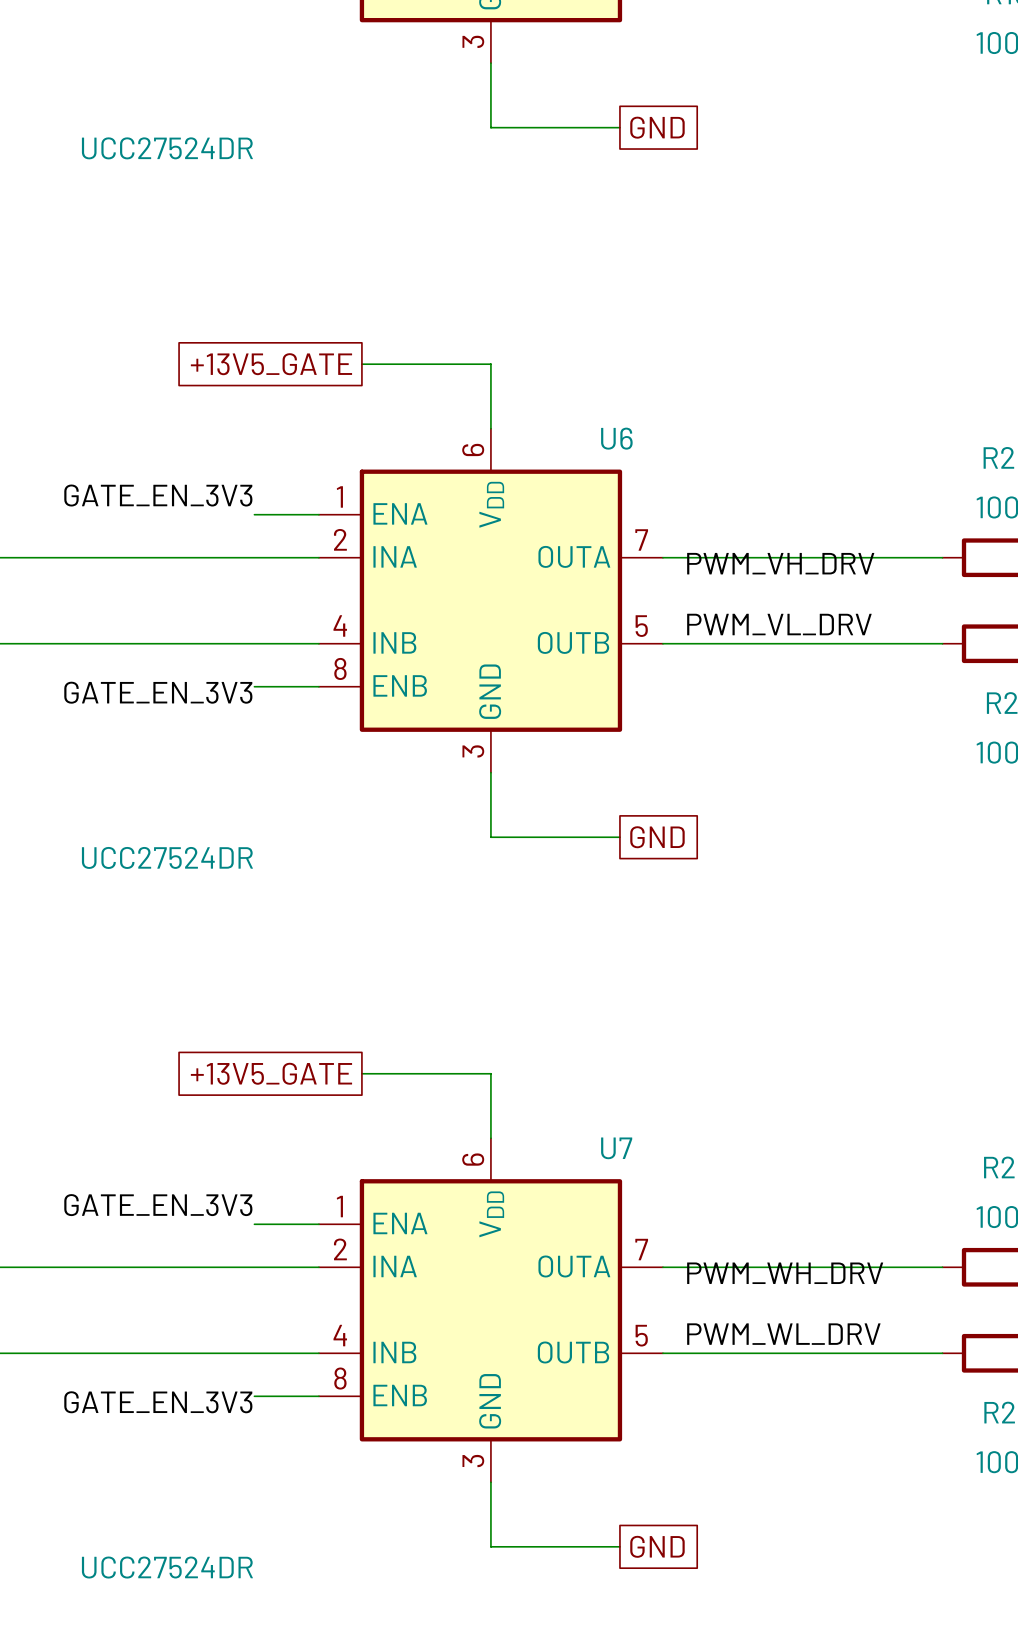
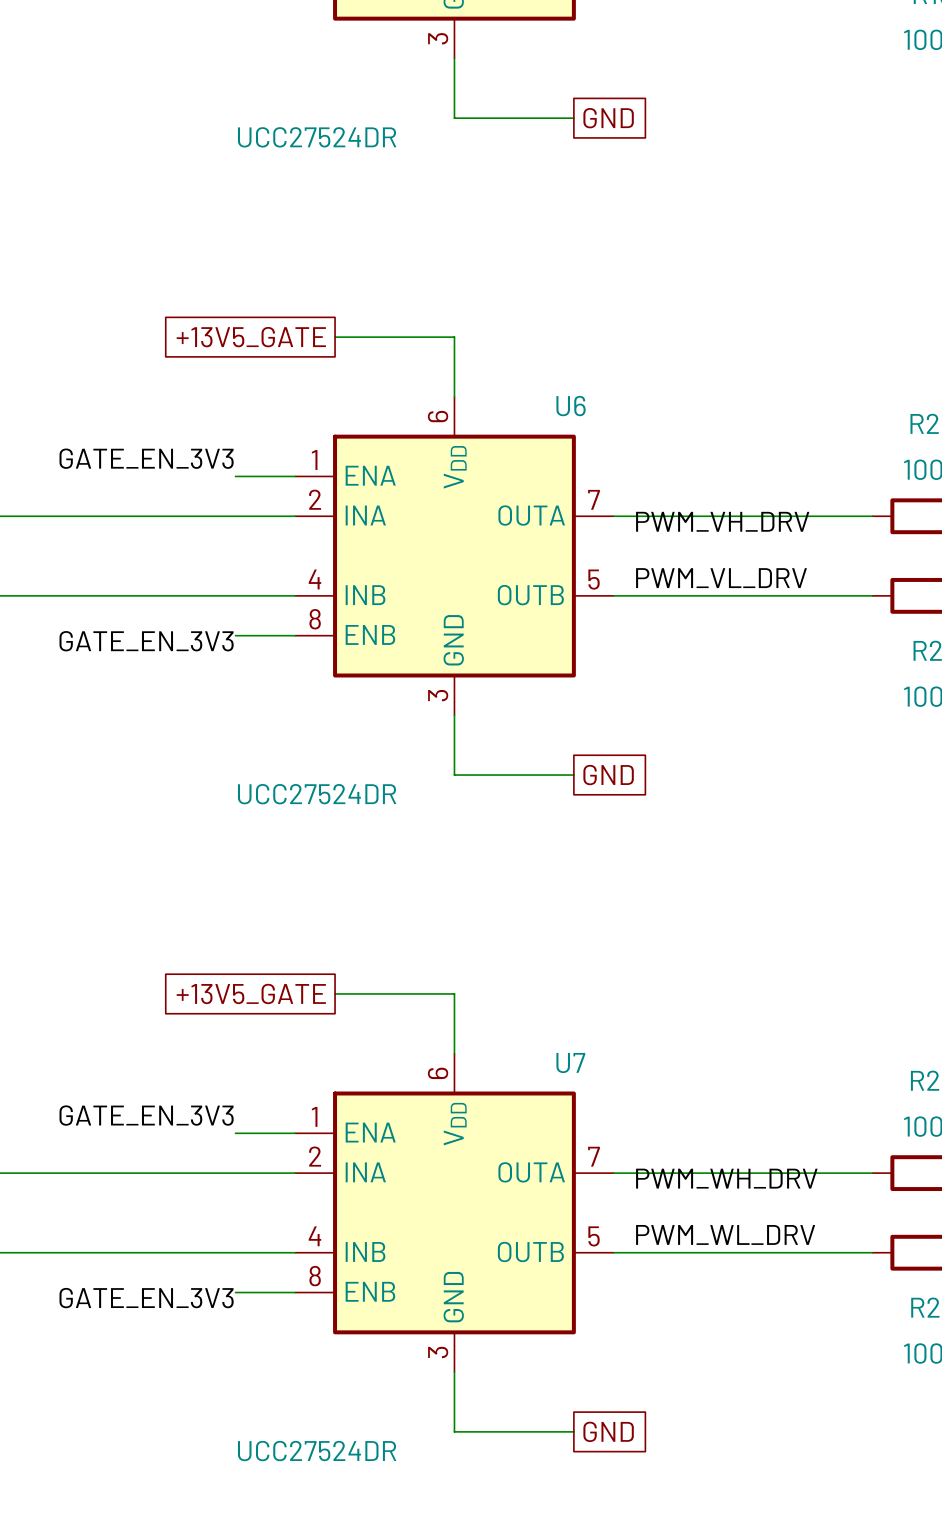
part value position: UCC27524DR (167, 148) -> UCC27524DR (317, 137)
U6 value position: UCC27524DR (167, 857) -> UCC27524DR (317, 794)
U7 value position: UCC27524DR (167, 1567) -> UCC27524DR (317, 1451)

